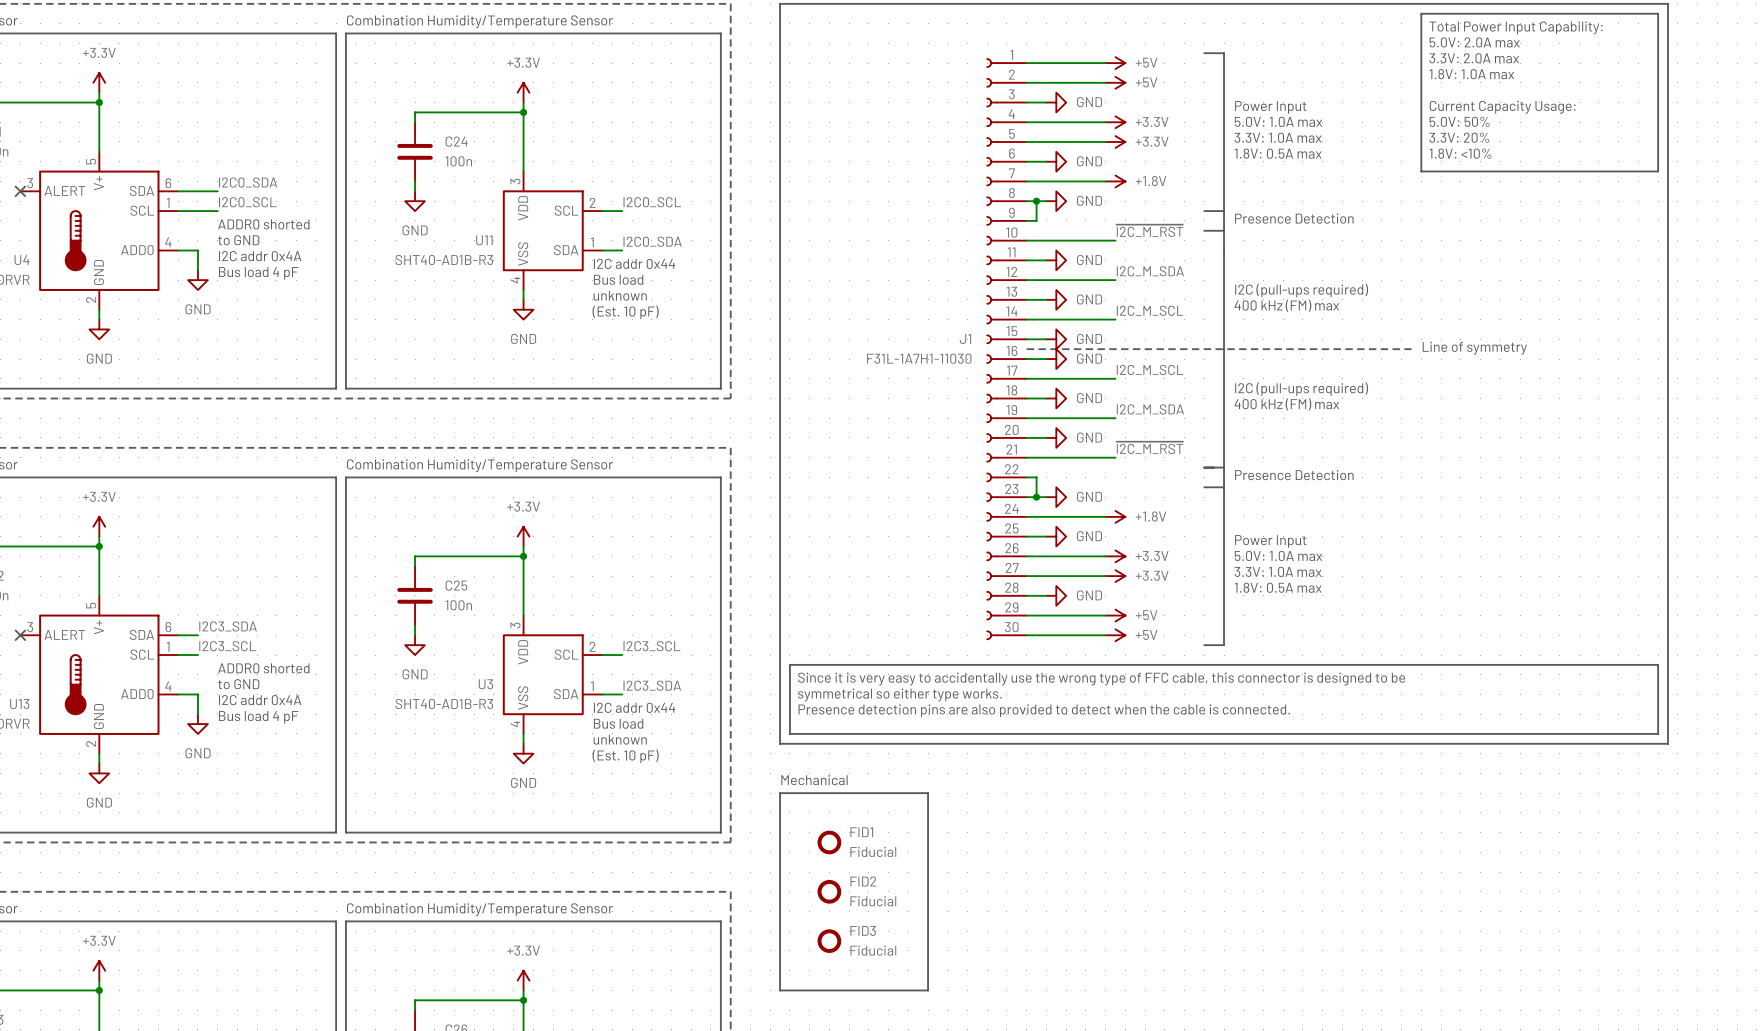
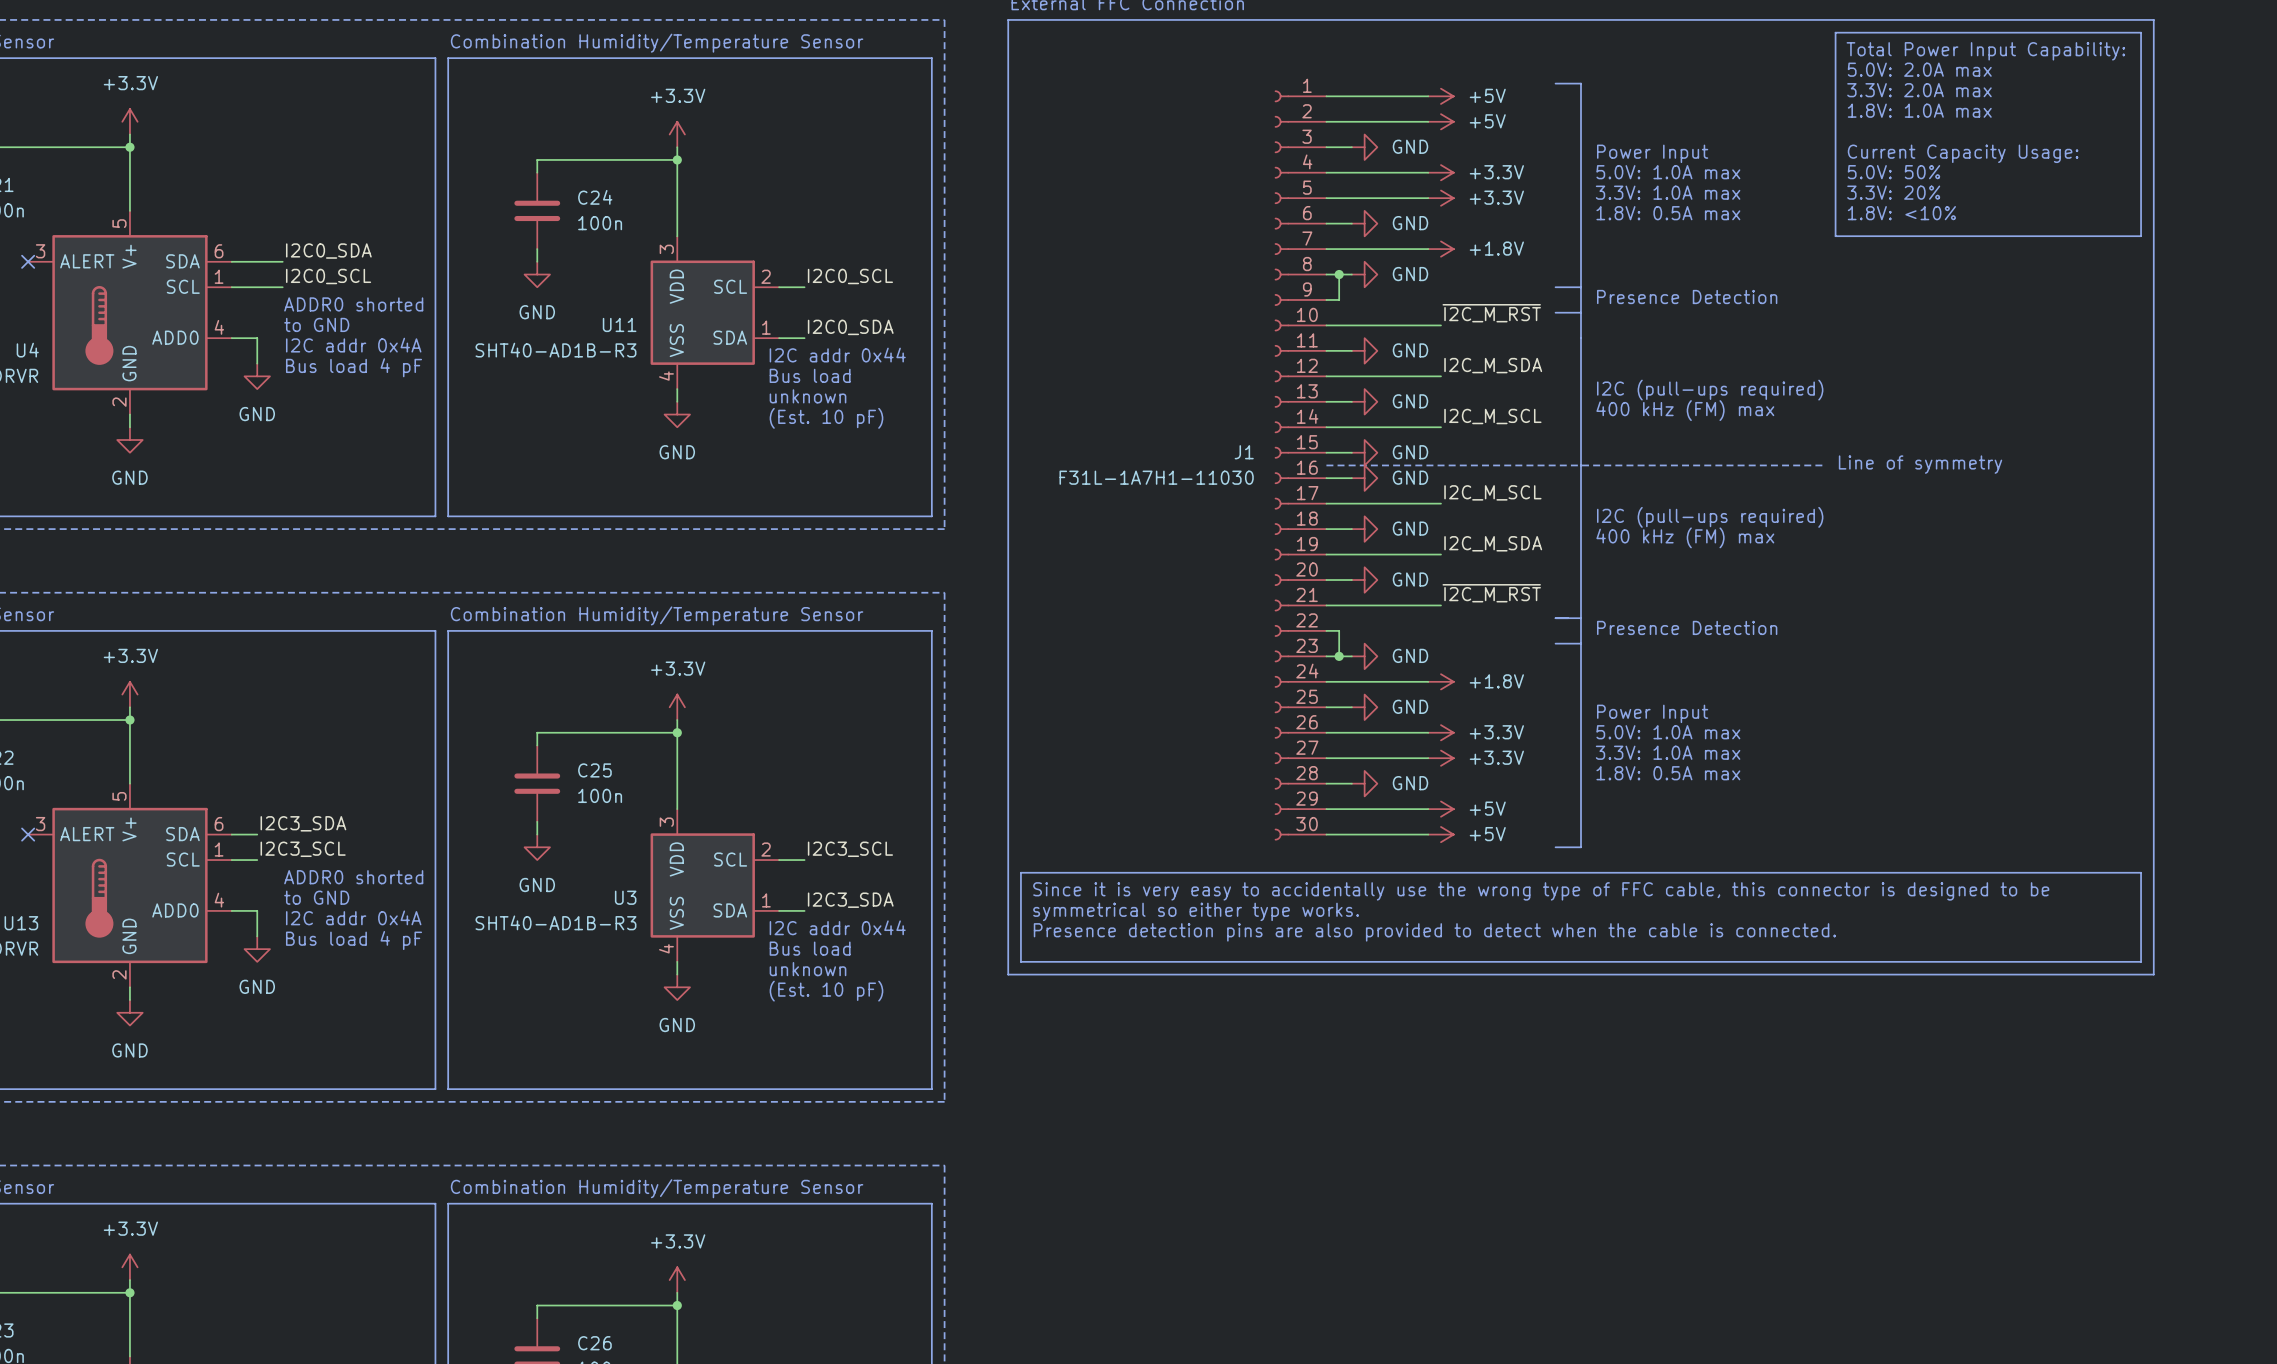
text: Mechanical (814, 780) -> none
line: (780, 793) (928, 793) (928, 990) (780, 990) (780, 793) -> none
FID1: Fiducial (829, 842) -> none
FID2: Fiducial (829, 891) -> none
FID3: Fiducial (829, 941) -> none

